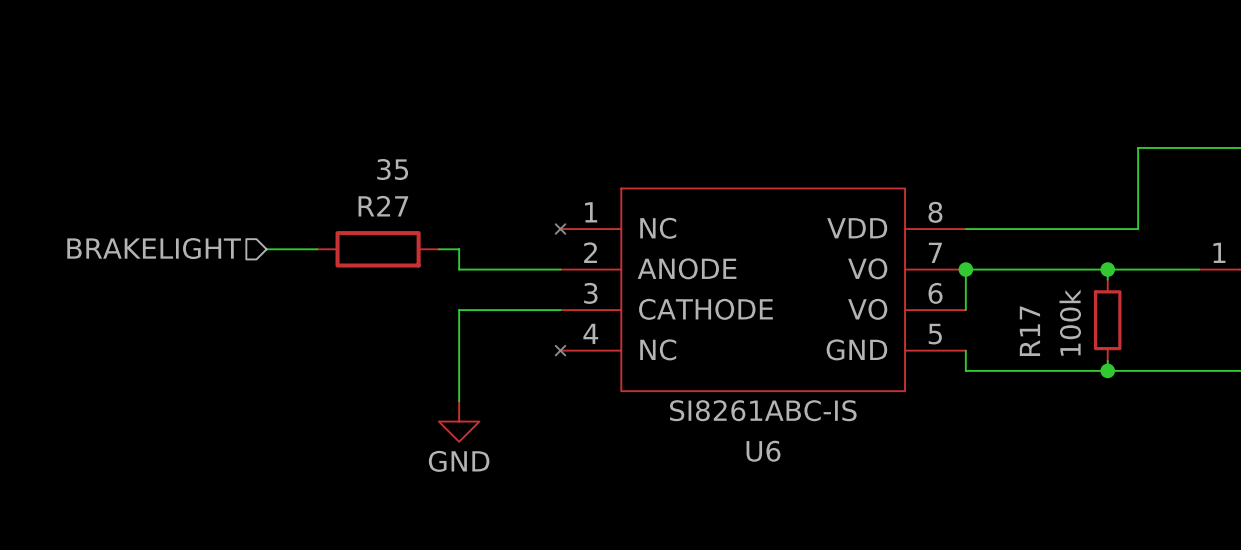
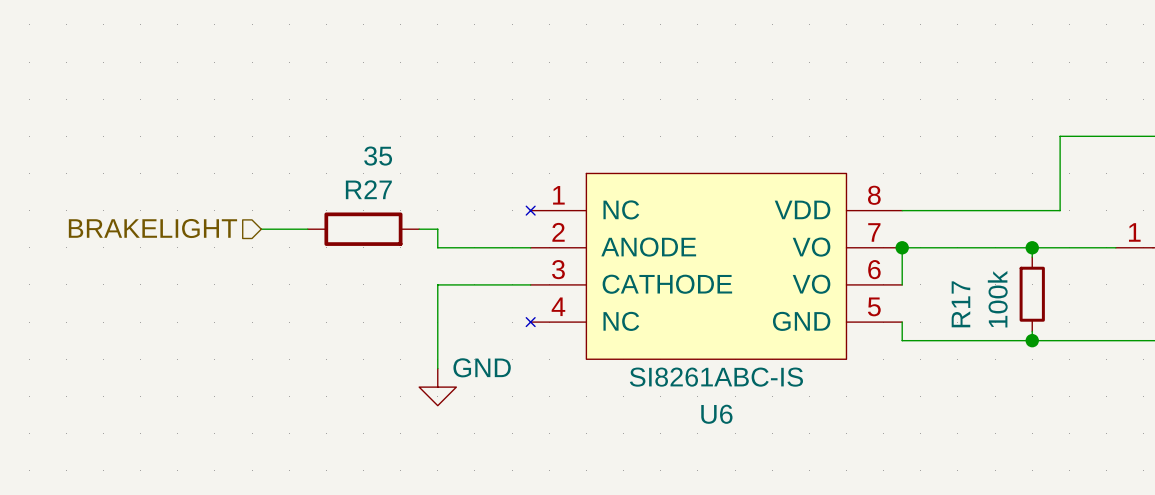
power symbol text position: GND (459, 461) -> GND (482, 367)

